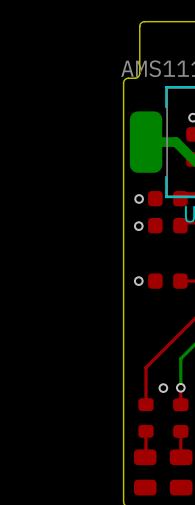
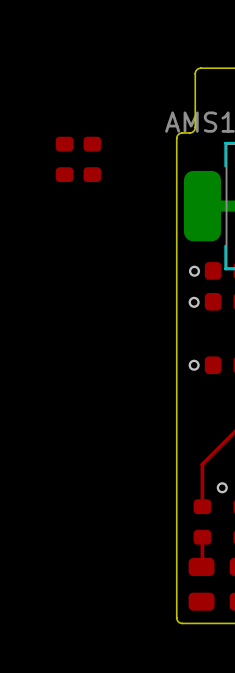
part: none -> (64, 159)
part: none -> (92, 159)

